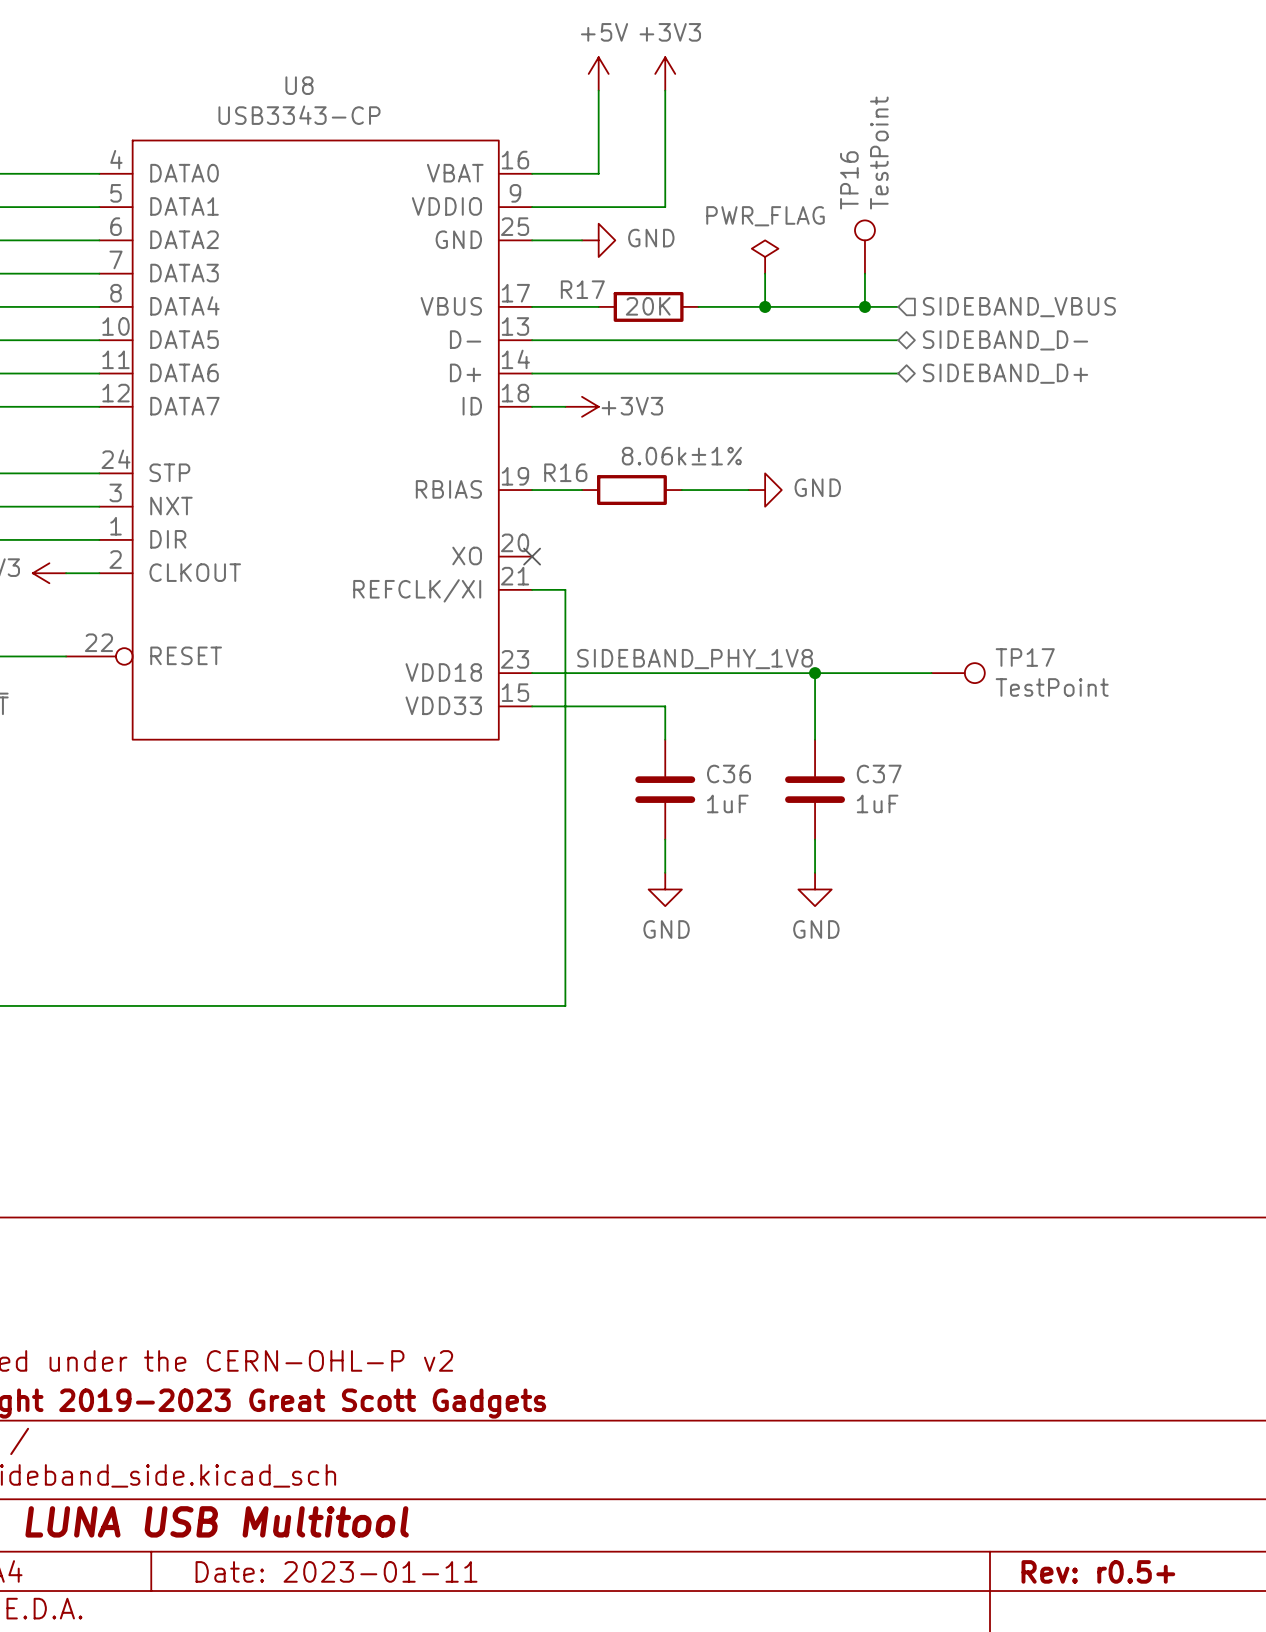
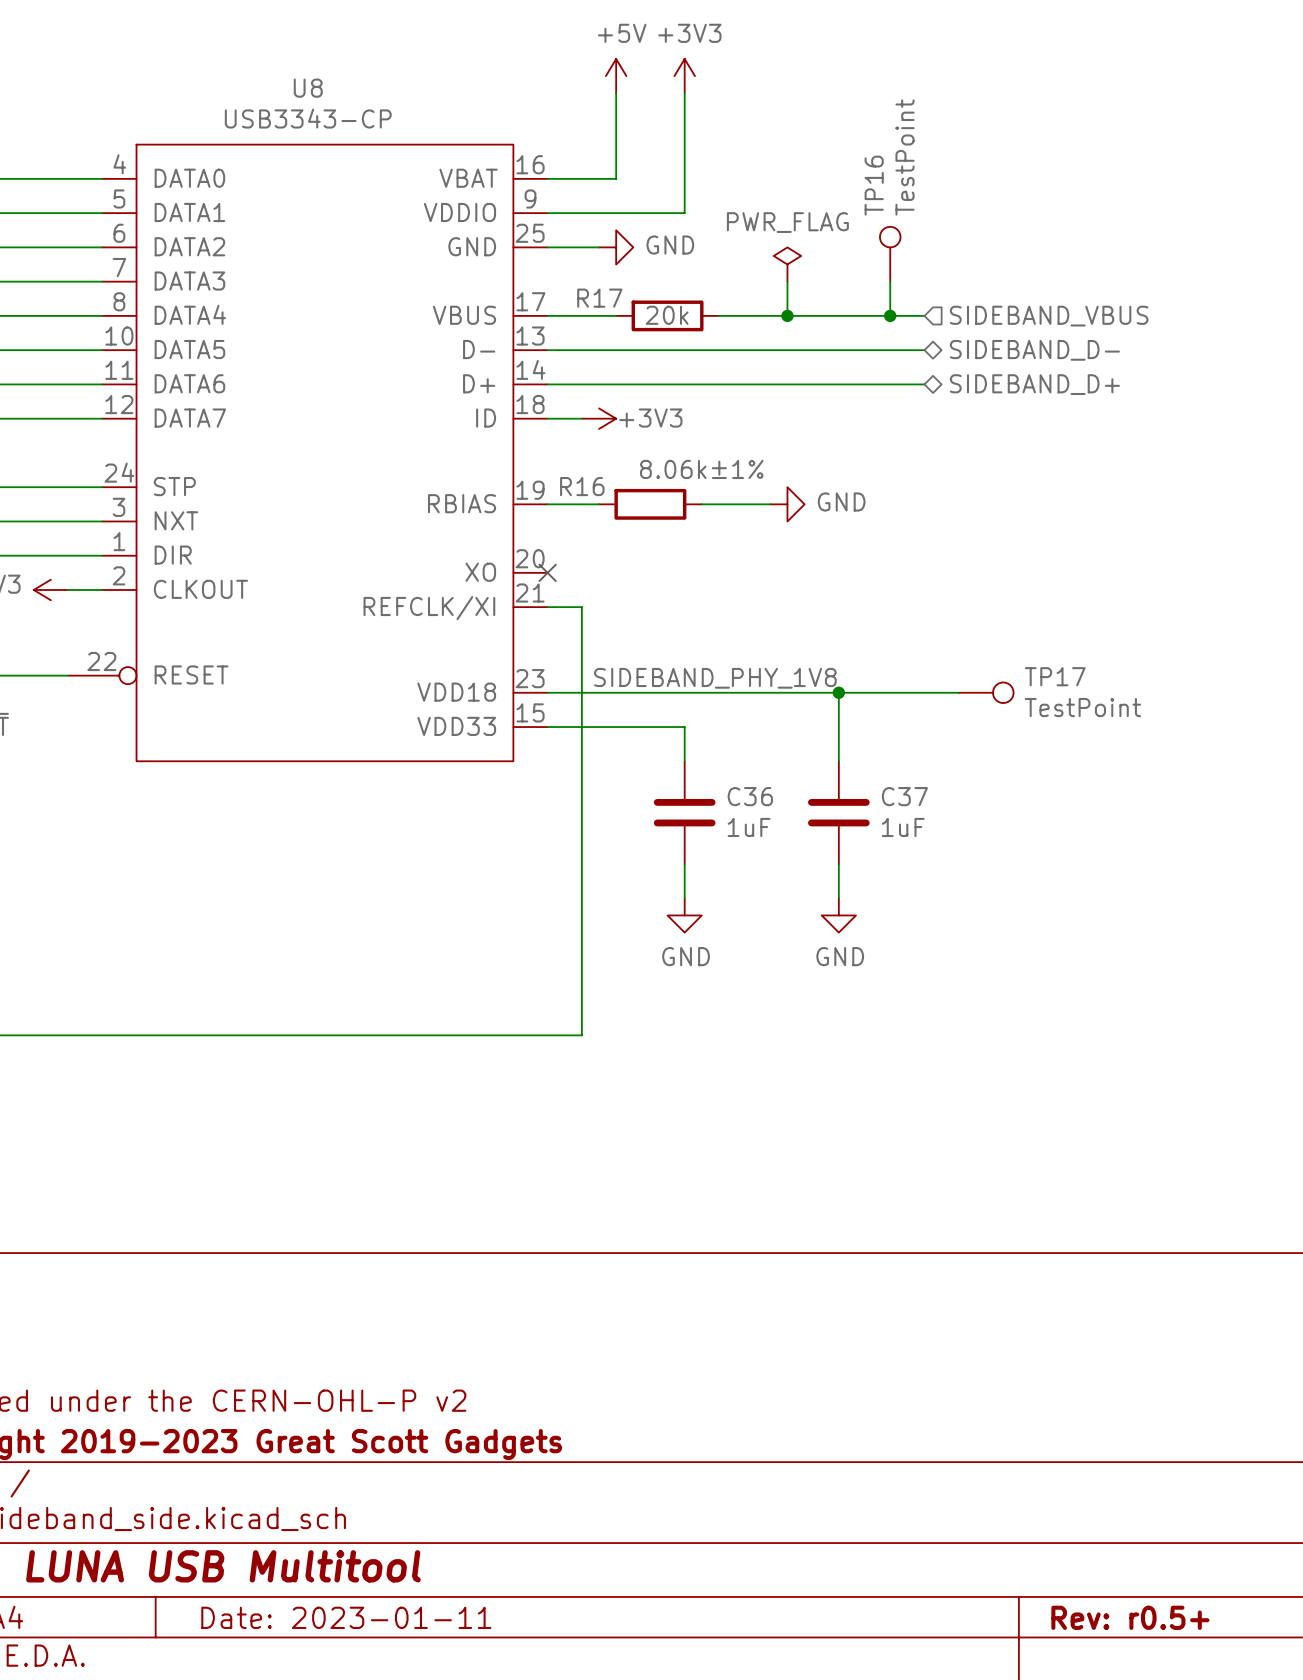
R17 value: 20K (648, 306) -> 20k (667, 315)

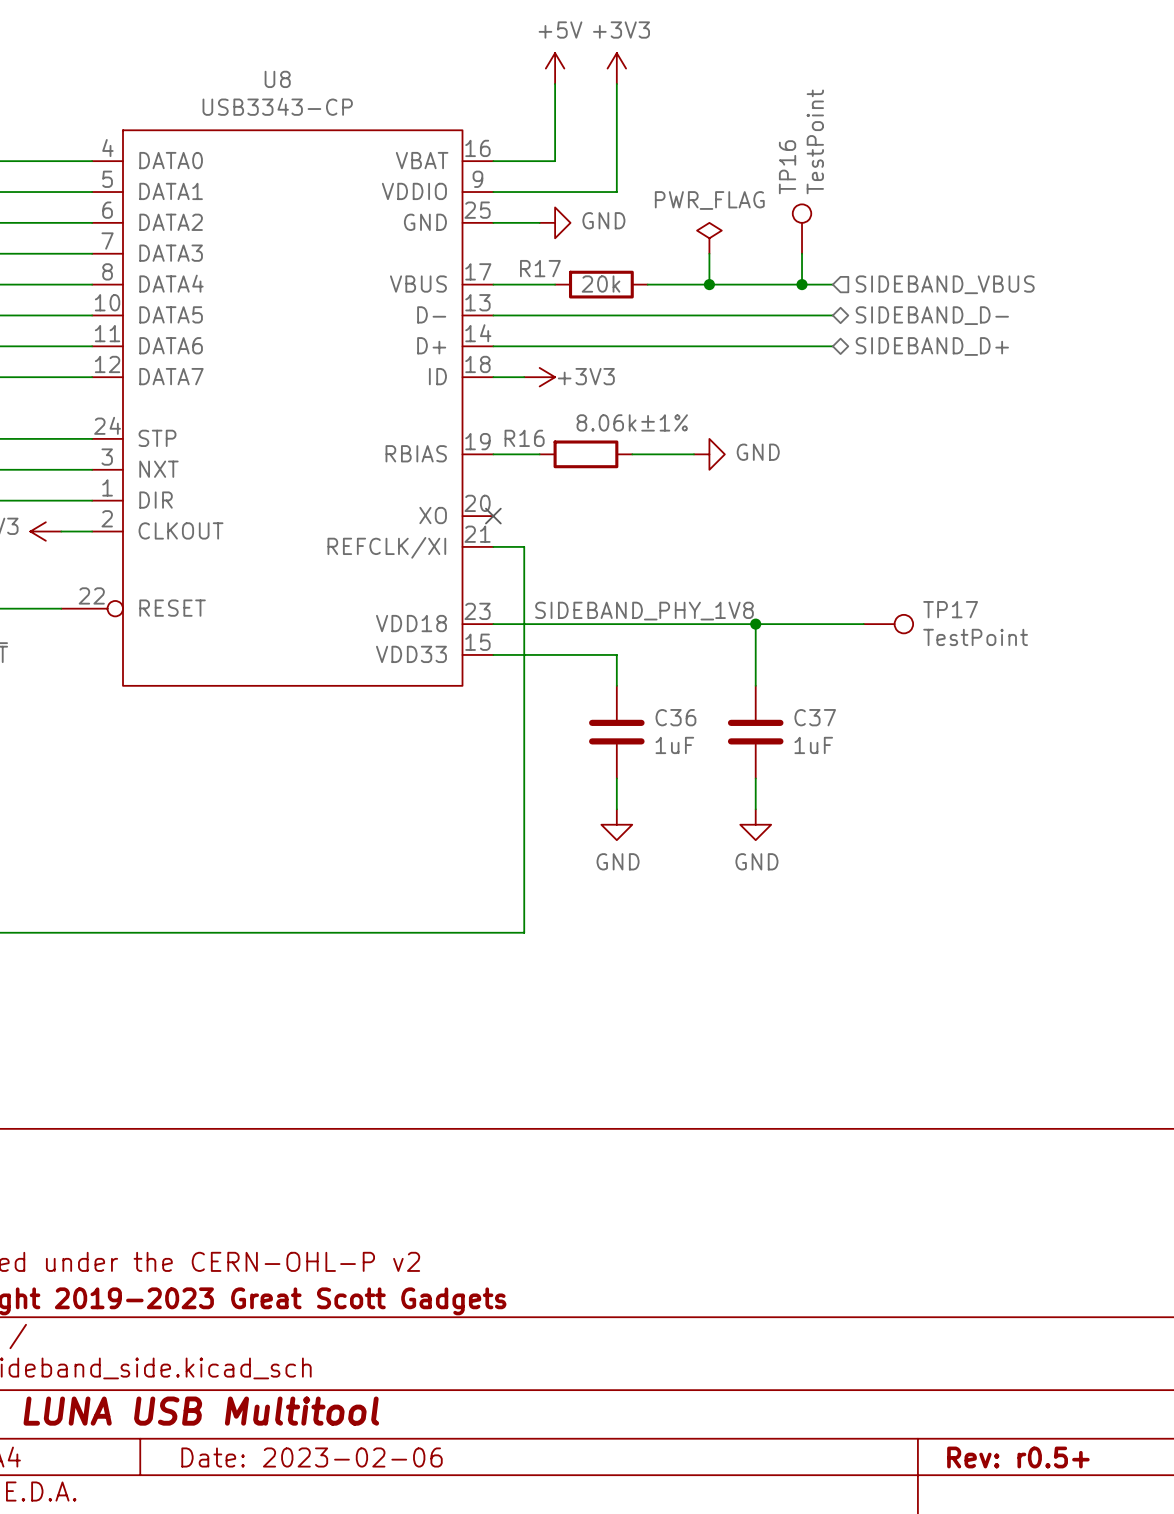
title block: Date: 2023-01-11 (346, 1617) -> Date: 2023-02-06 (312, 1457)

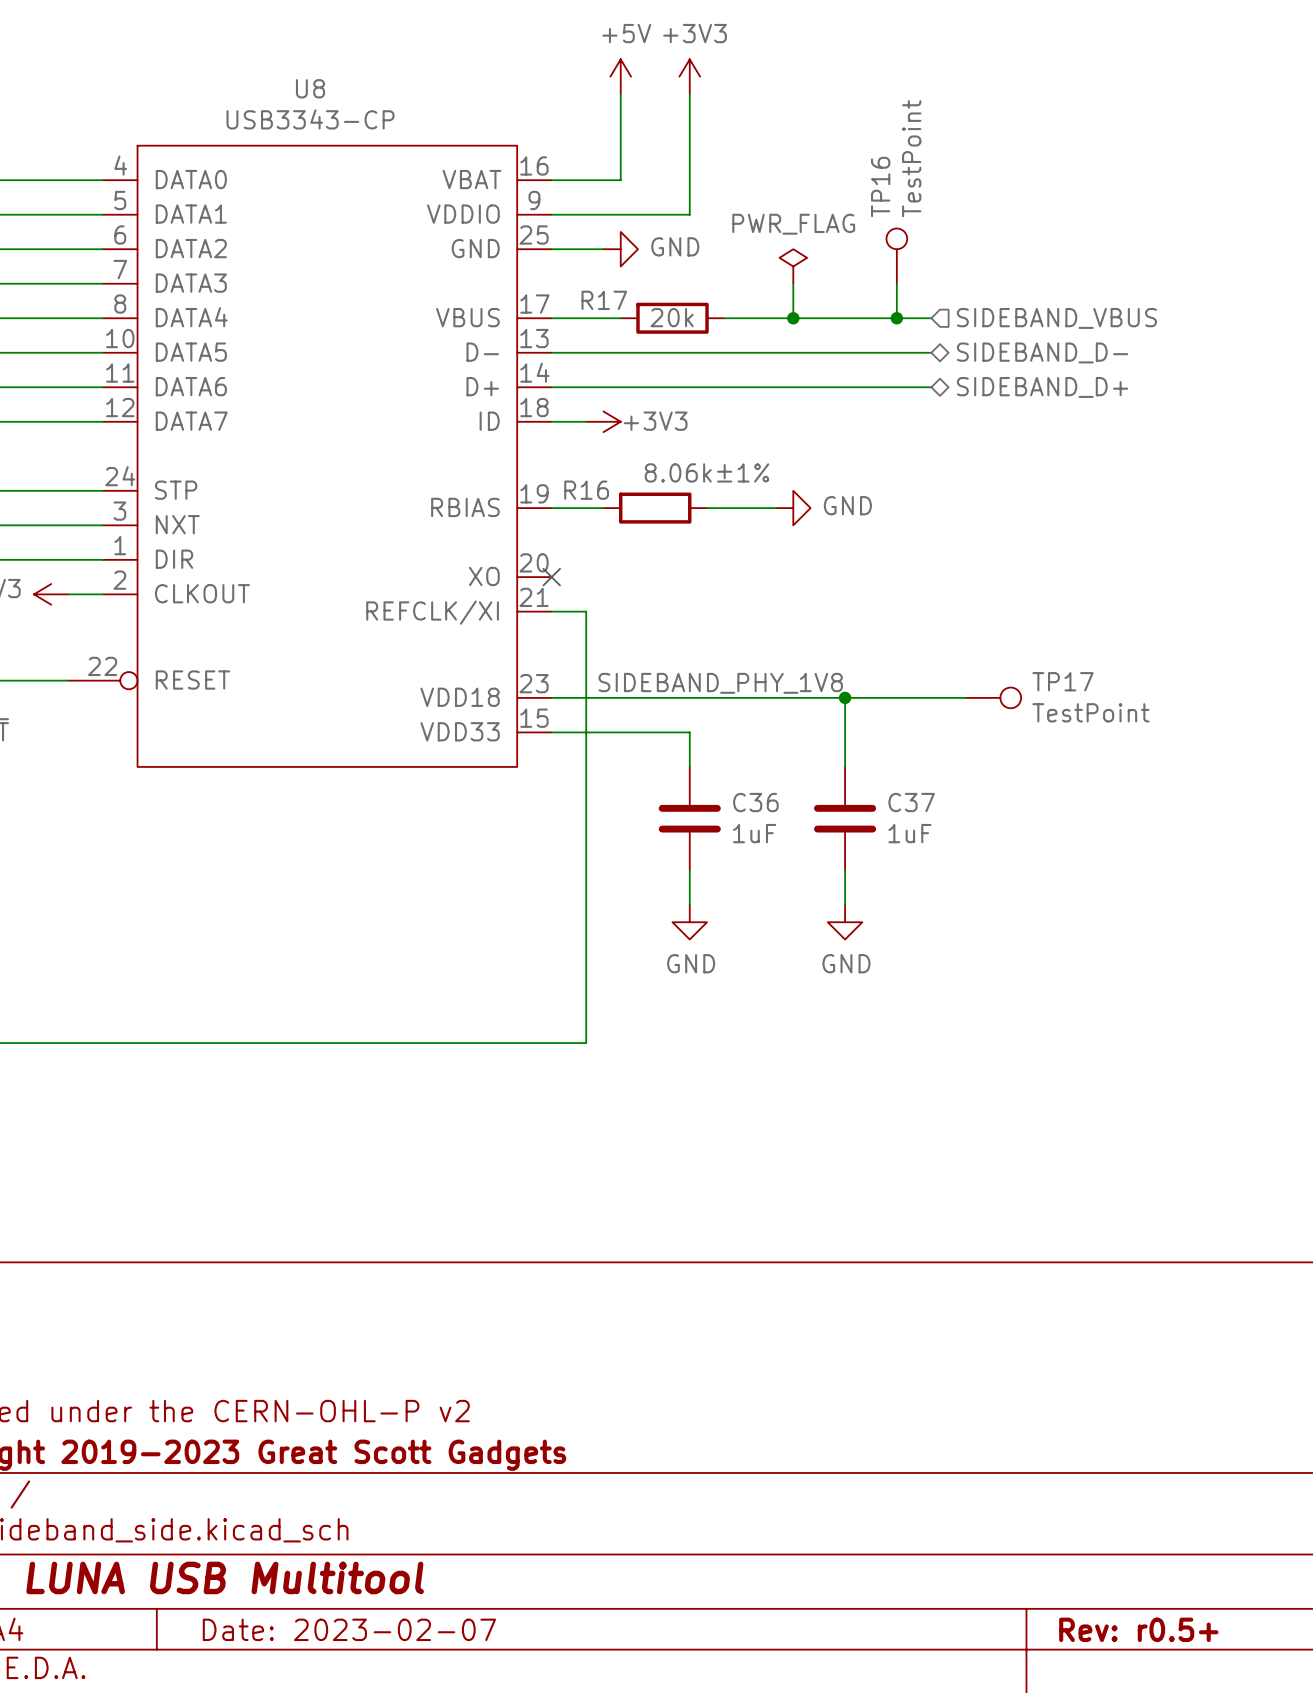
title block: Date: 2023-02-06 (312, 1457) -> Date: 2023-02-07 (349, 1629)

